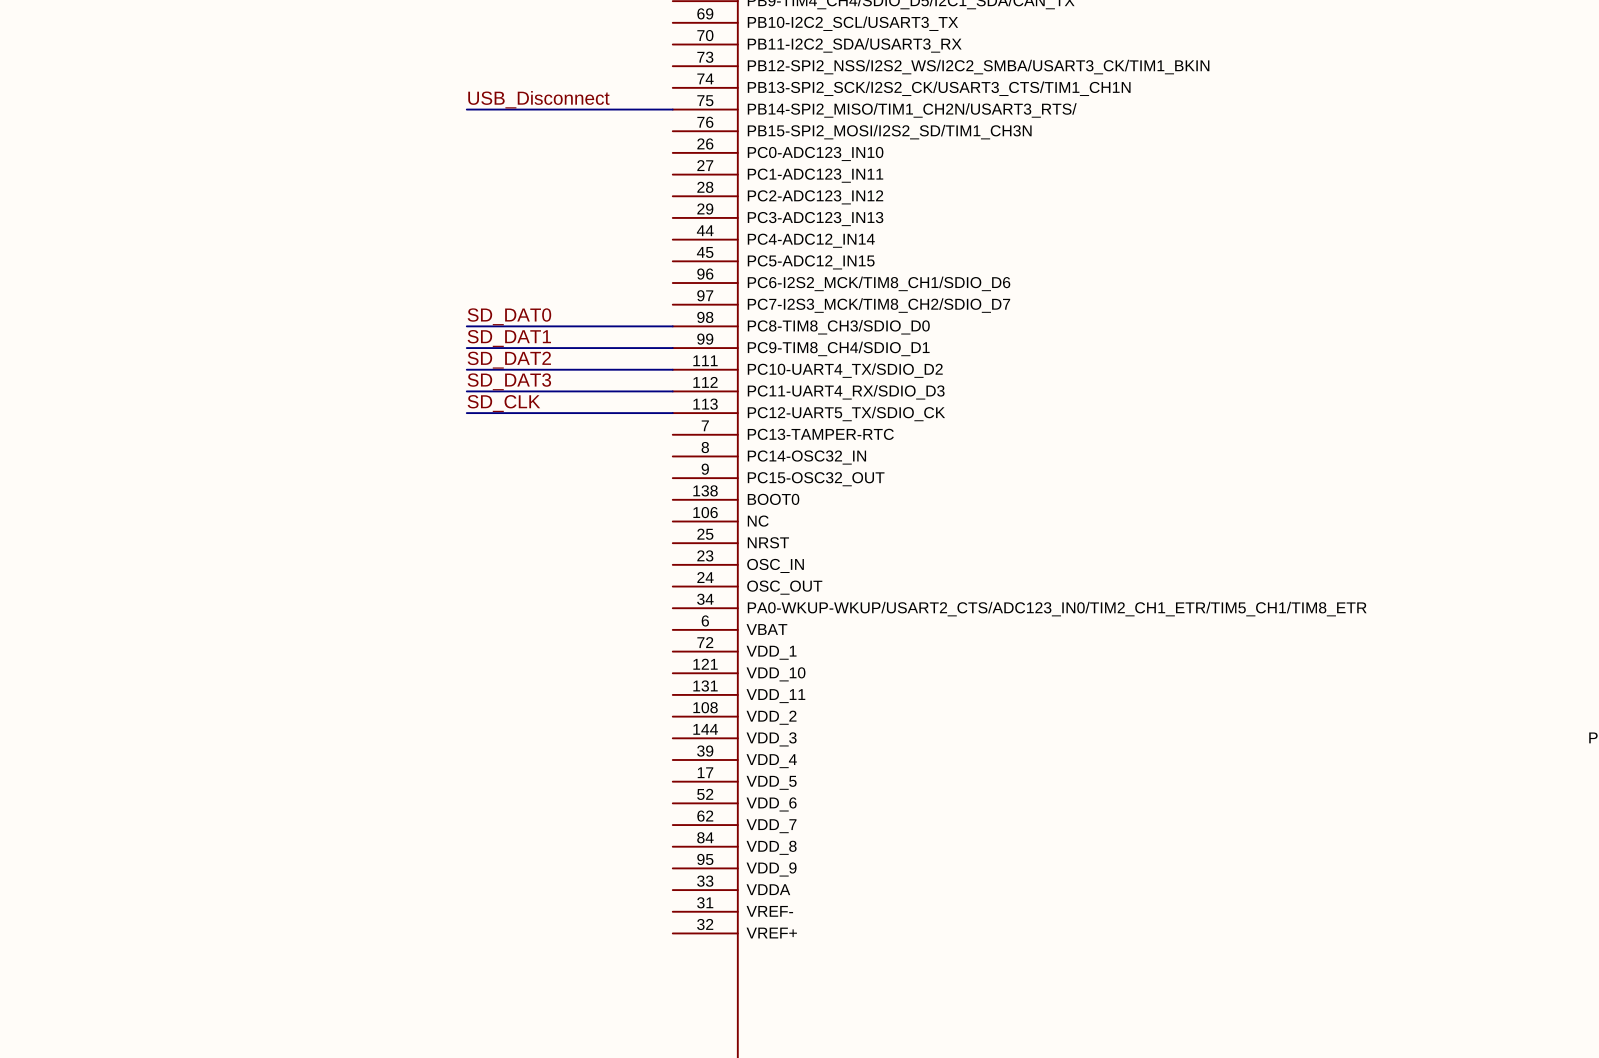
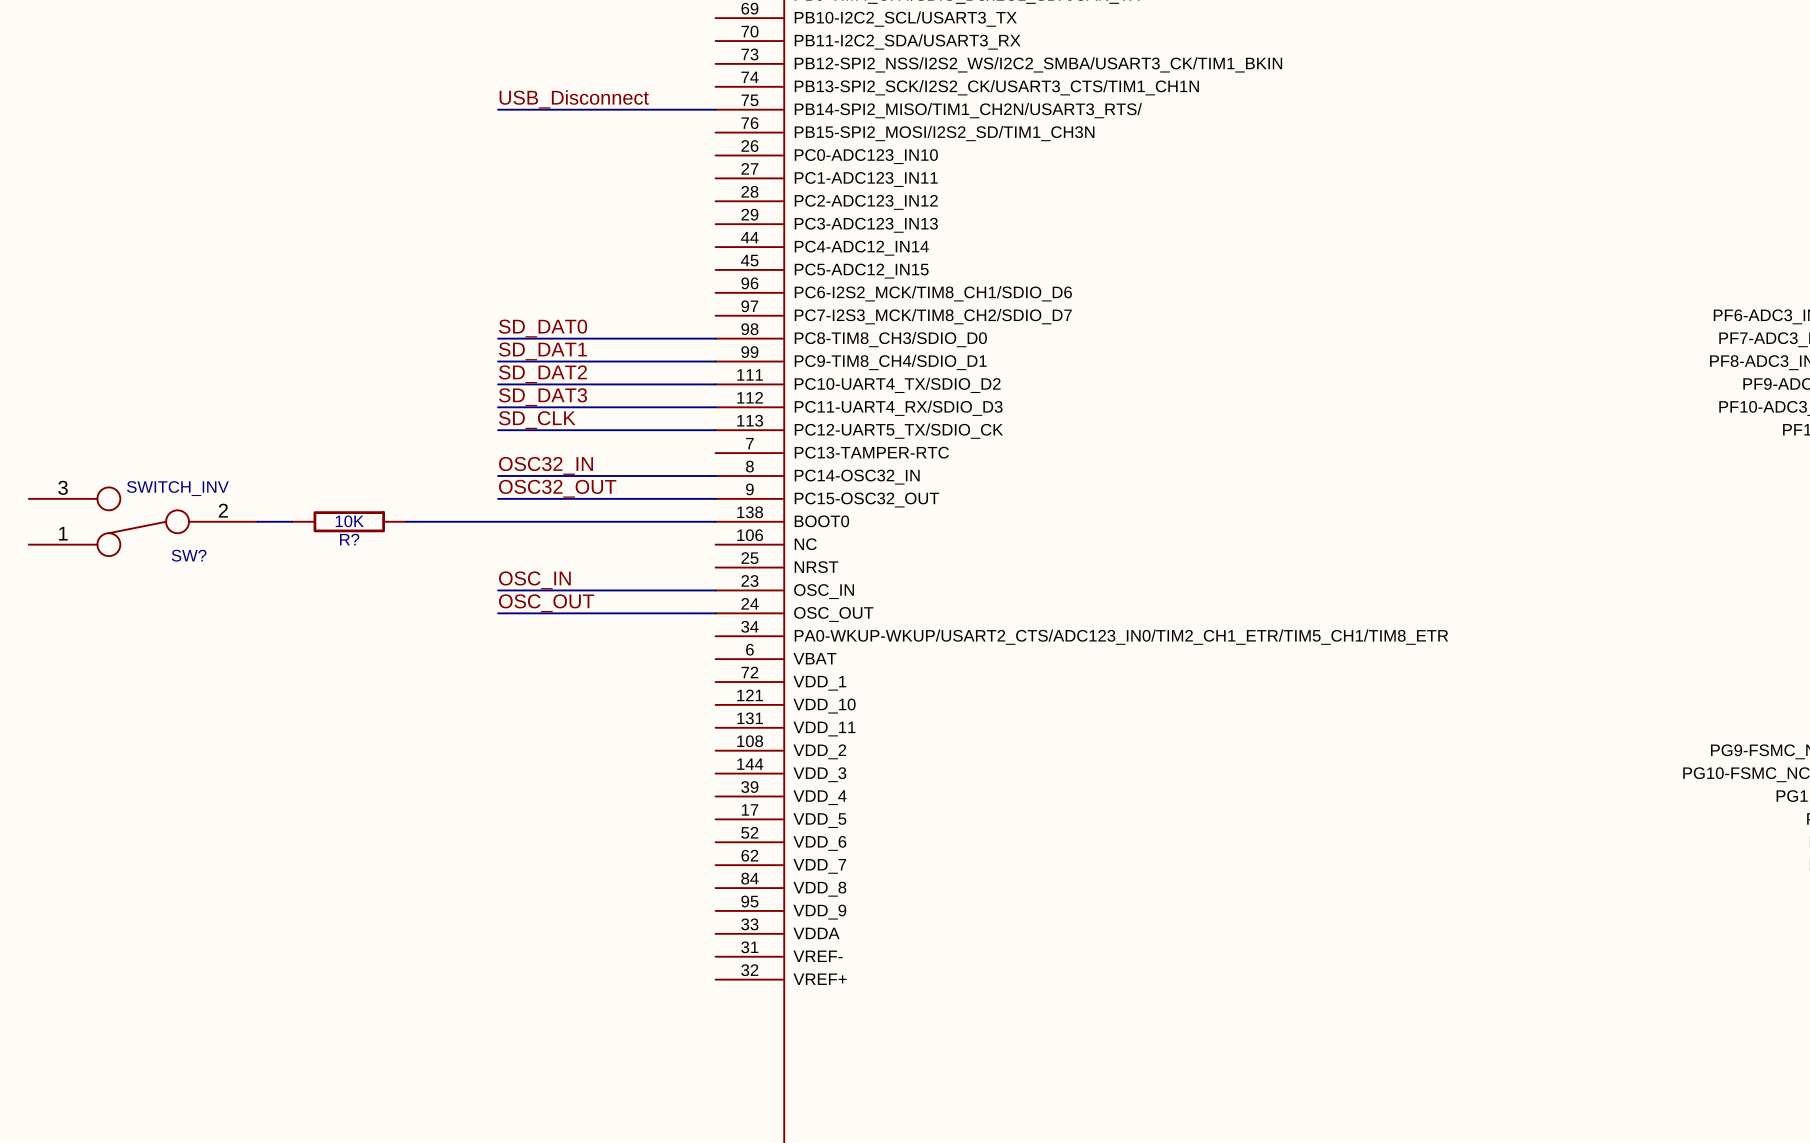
label: none -> OSC32_IN (545, 465)
wire: none -> (498, 475) (715, 475)
label: none -> OSC32_OUT (557, 488)
wire: none -> (498, 498) (715, 498)
SW?: none -> SWITCH_INV (143, 521)
wire: none -> (257, 521) (292, 521)
R?: none -> 10K (349, 521)
wire: none -> (406, 521) (715, 521)
label: none -> OSC_IN (534, 580)
wire: none -> (498, 590) (715, 590)
label: none -> OSC_OUT (546, 603)
wire: none -> (498, 613) (715, 613)

